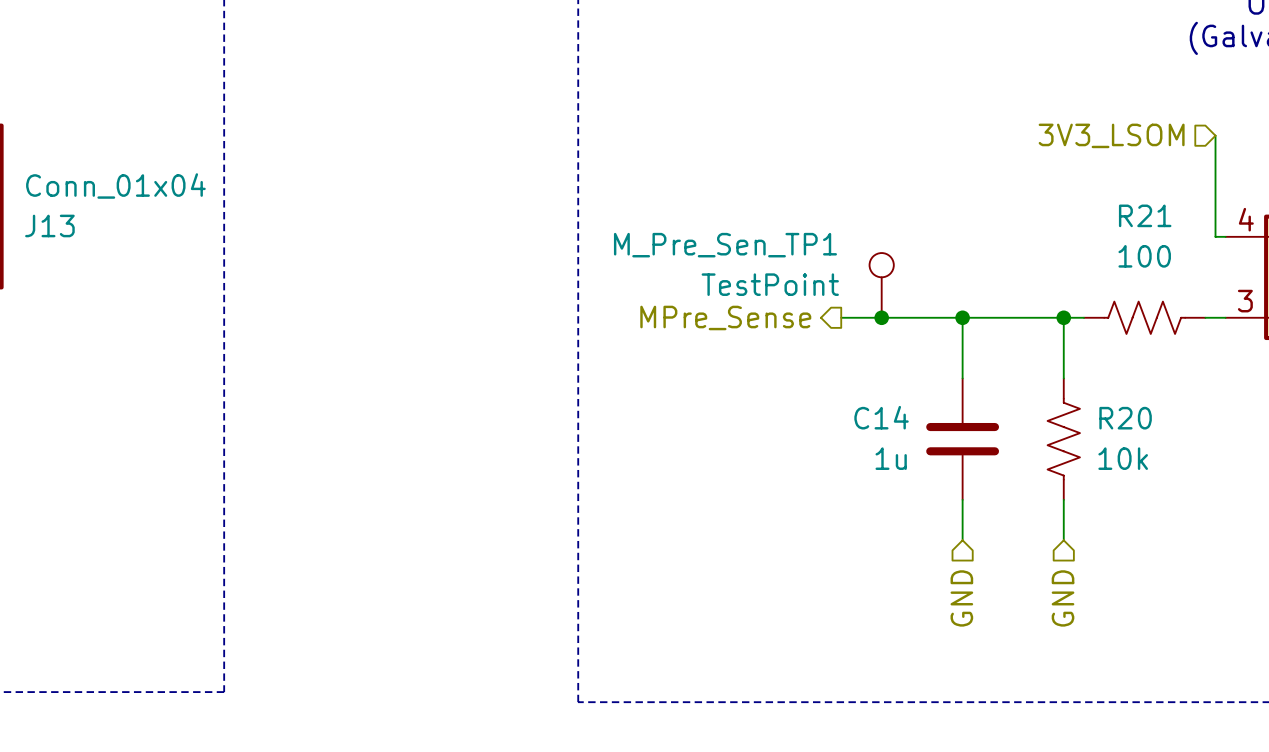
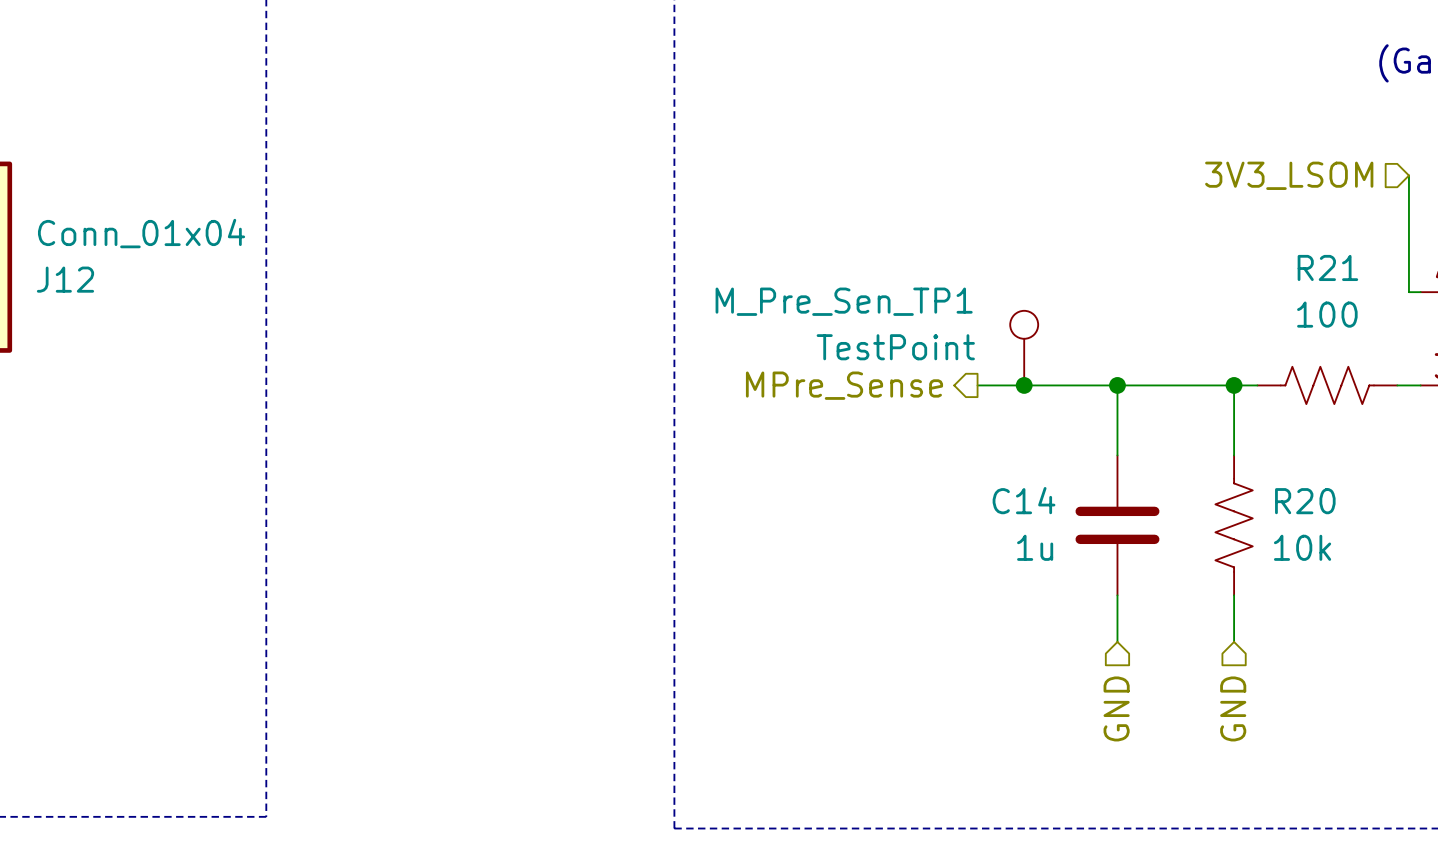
J13 name: J13 (49, 225) -> J12 (65, 279)

